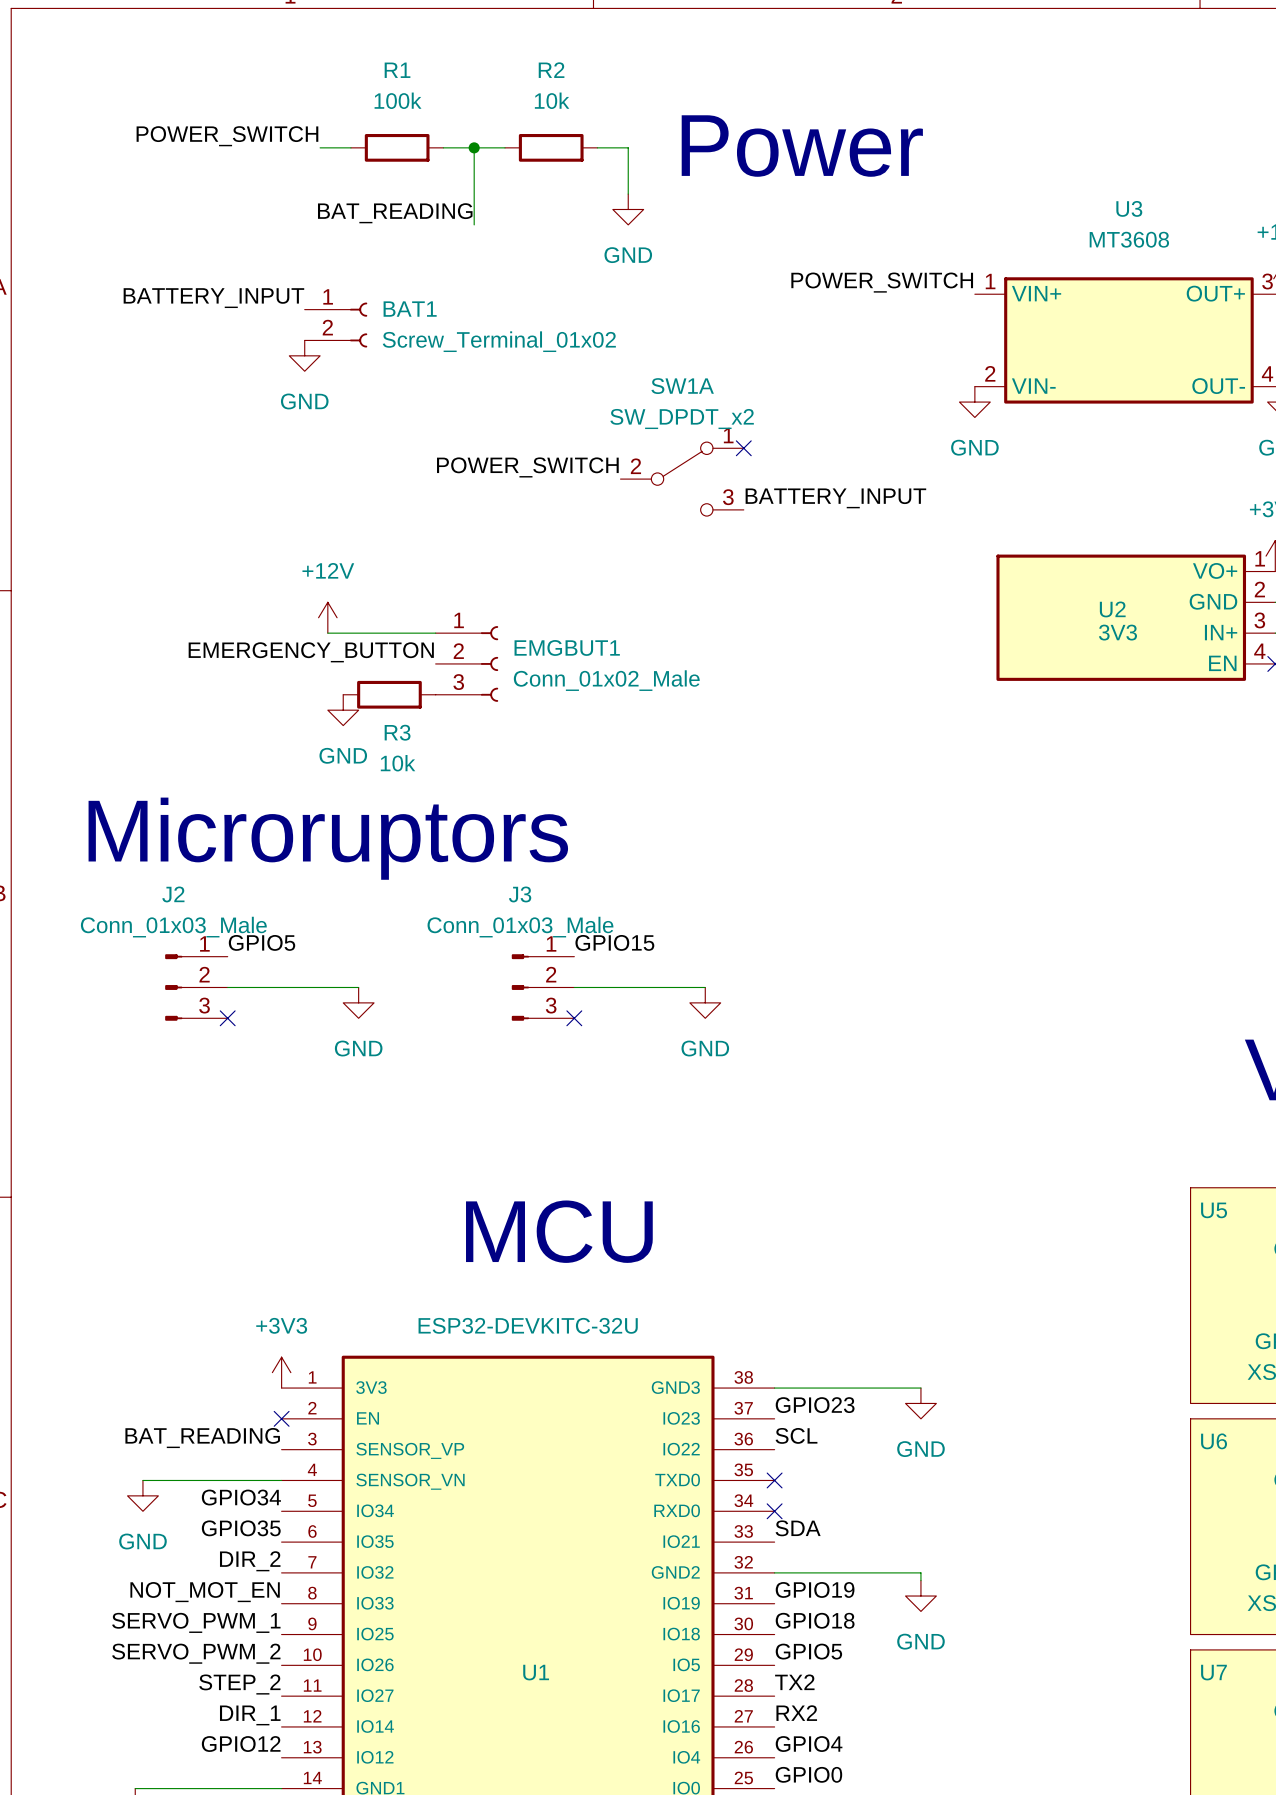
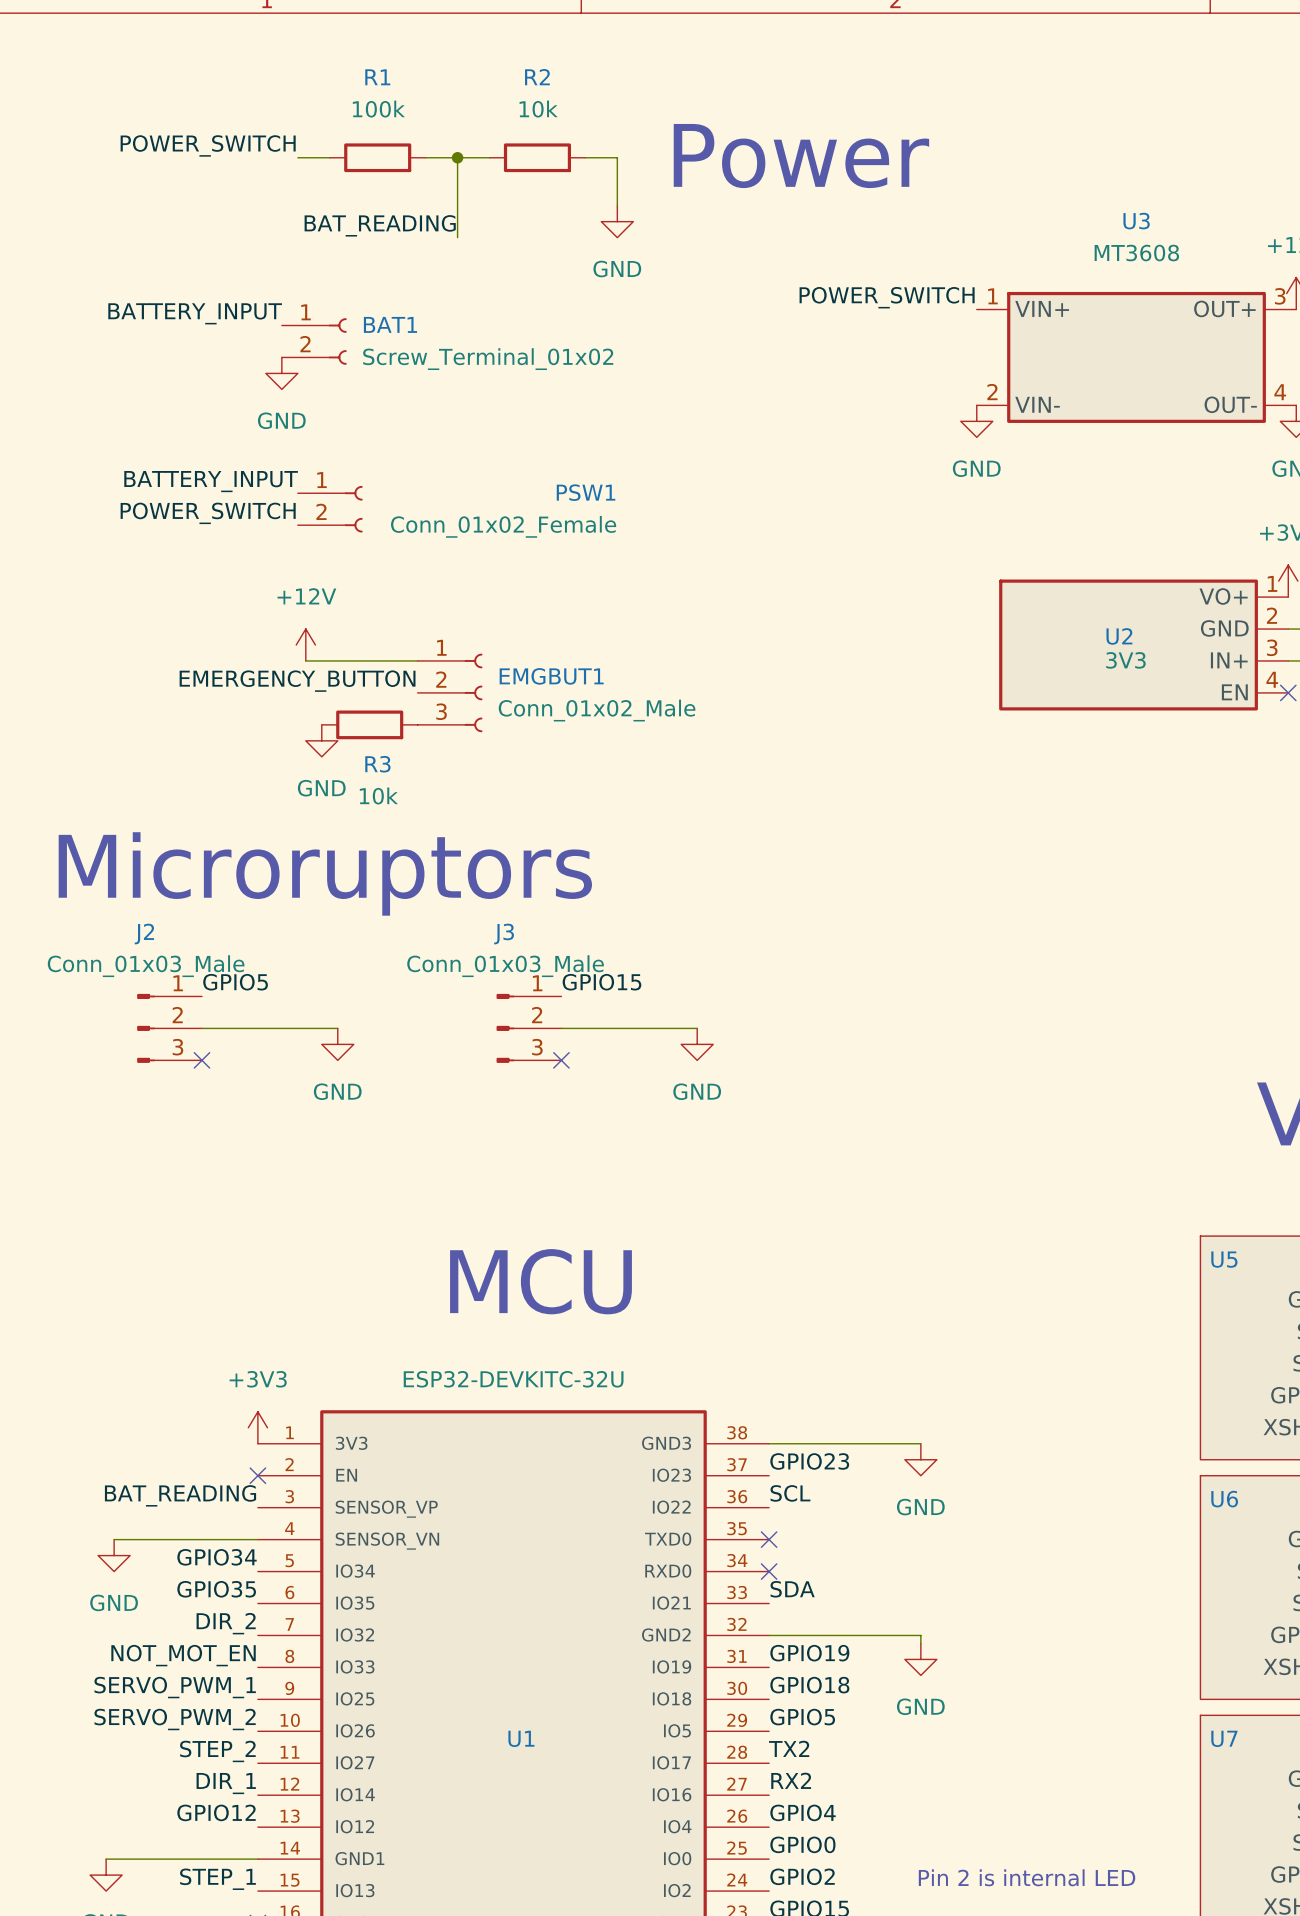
no-connect mark: (743, 448) -> none
label: none -> BATTERY_INPUT (211, 481)
label position: POWER_SWITCH (527, 467) -> POWER_SWITCH (208, 513)
SW1A: SW_DPDT_x2 (682, 479) -> none
PSW1: none -> Conn_01x02_Female (330, 509)
label: BATTERY_INPUT (835, 498) -> none

